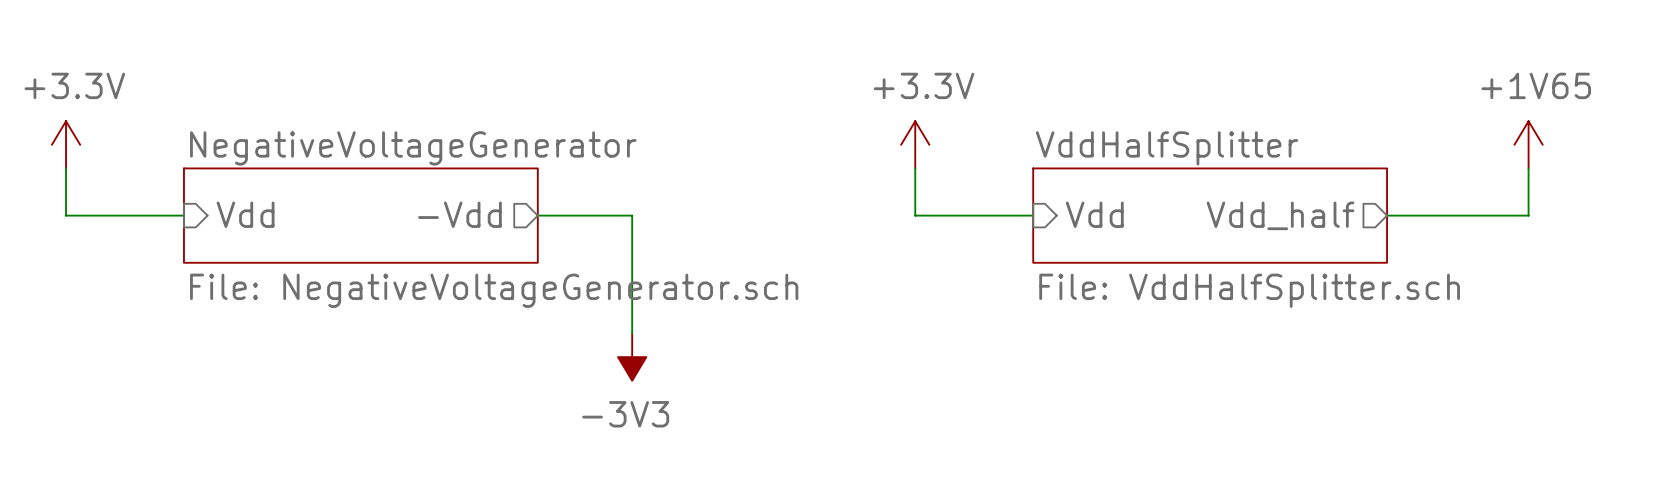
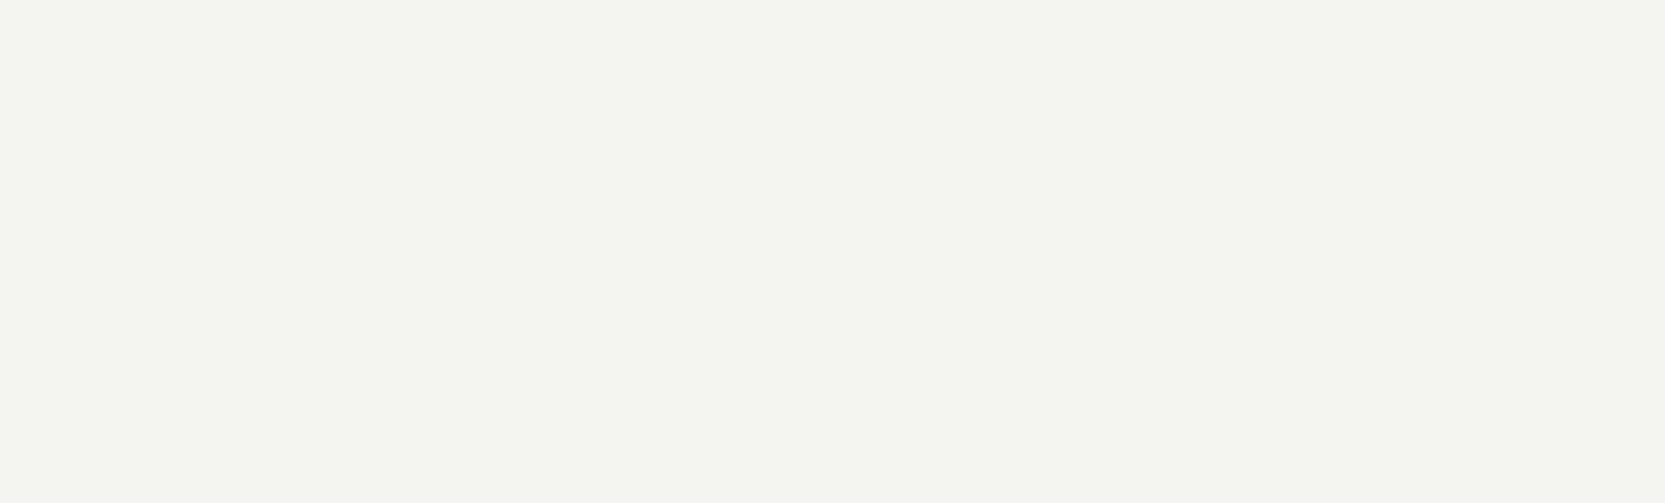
power symbol: +3.3V (66, 144) -> none
power symbol: +3.3V (915, 144) -> none
power symbol: +1V65 (1528, 144) -> none
wire: (66, 168) (66, 215) (183, 215) -> none
wire: (915, 168) (915, 215) (1033, 215) -> none
wire: (1528, 168) (1528, 215) (1387, 215) -> none
sheet pin: Vdd (245, 214) -> none
sheet pin: -Vdd (459, 214) -> none
sheet pin: Vdd (1094, 214) -> none
sheet NegativeVoltageGenerator: File: NegativeVoltageGenerator.sch (360, 215) -> none
wire: (537, 215) (632, 215) (632, 333) -> none
sheet VddHalfSplitter: File: VddHalfSplitter.sch (1210, 215) -> none
sheet pin: Vdd_half (1280, 215) -> none
power symbol: -3V3 (632, 357) -> none

